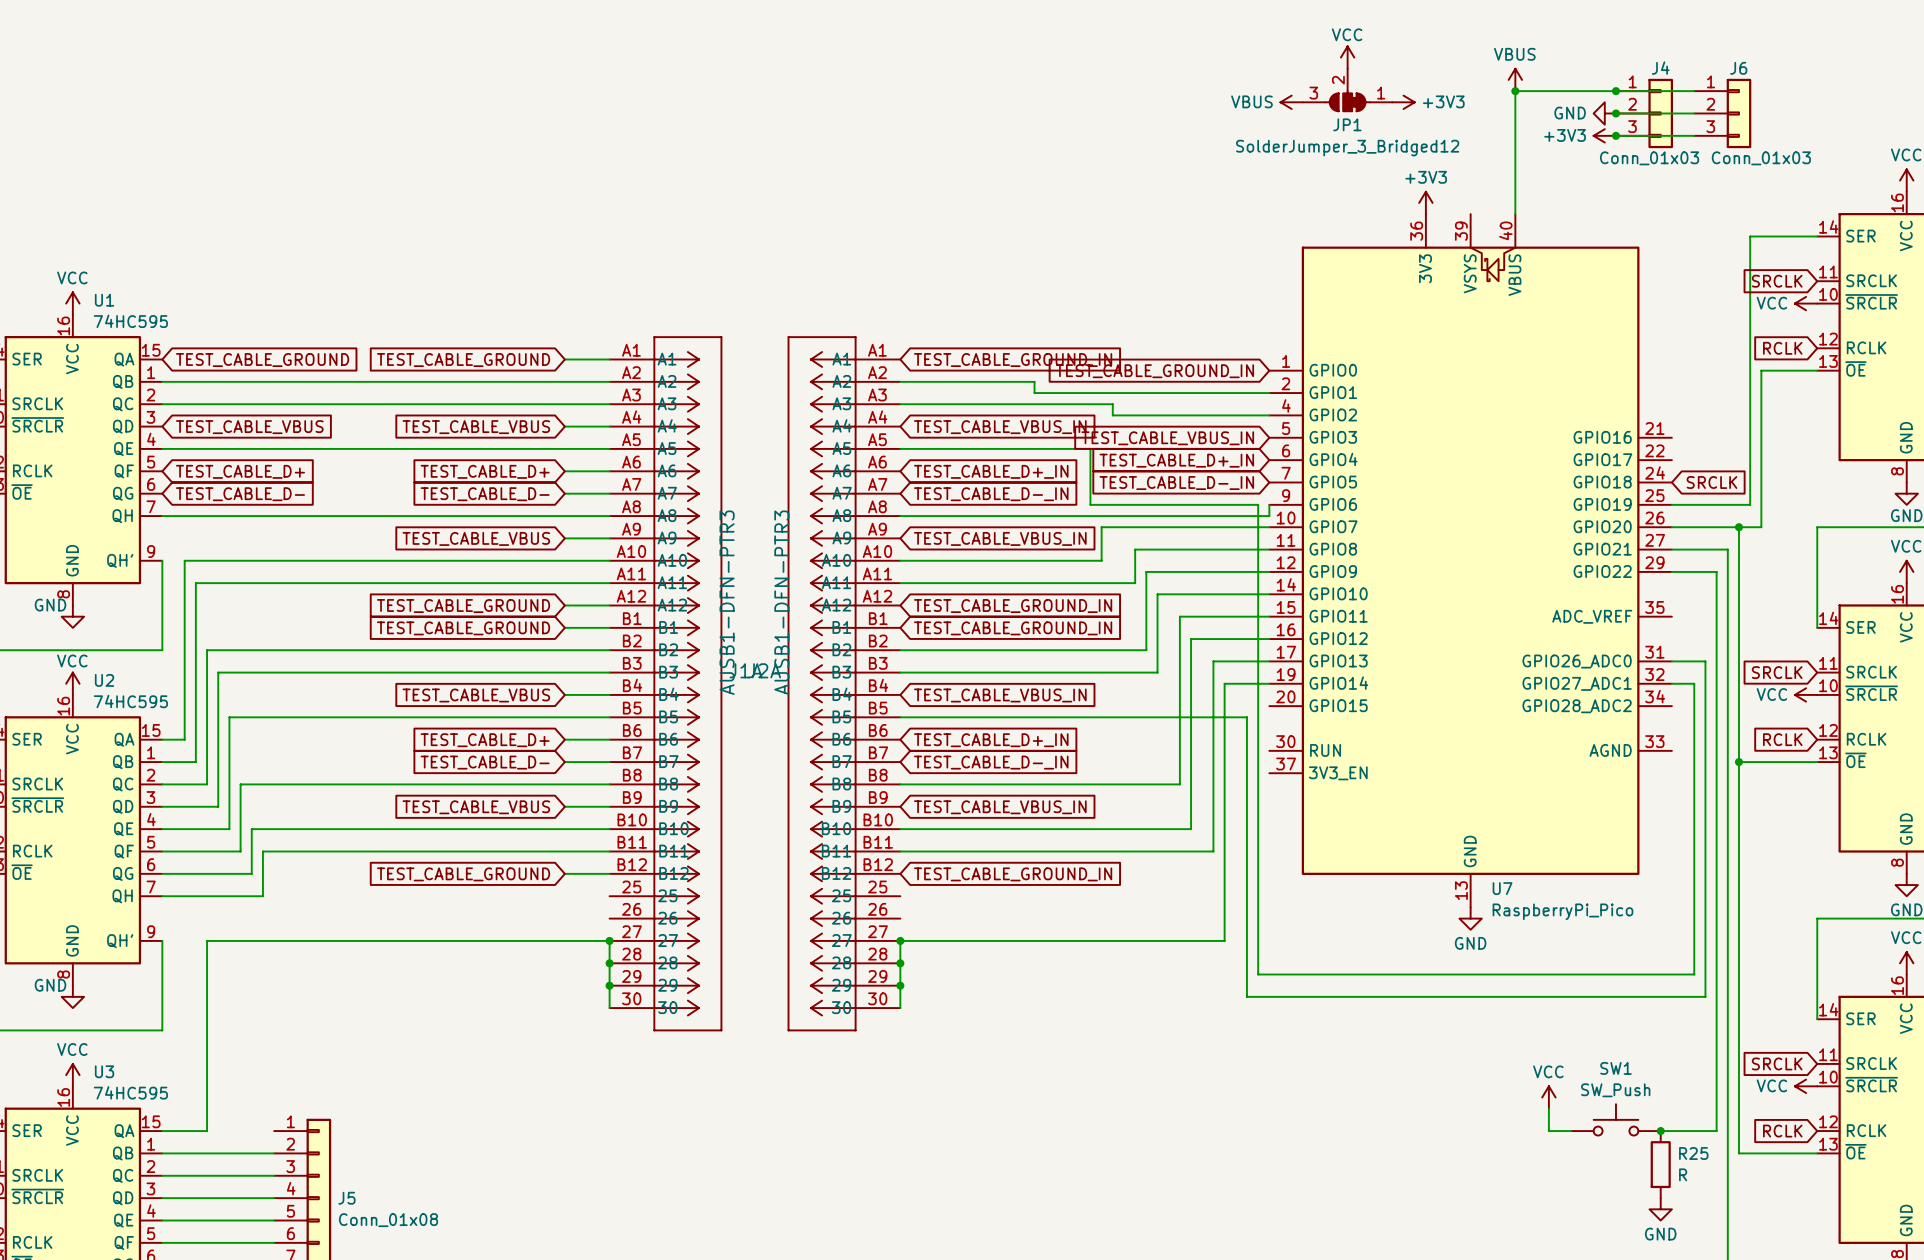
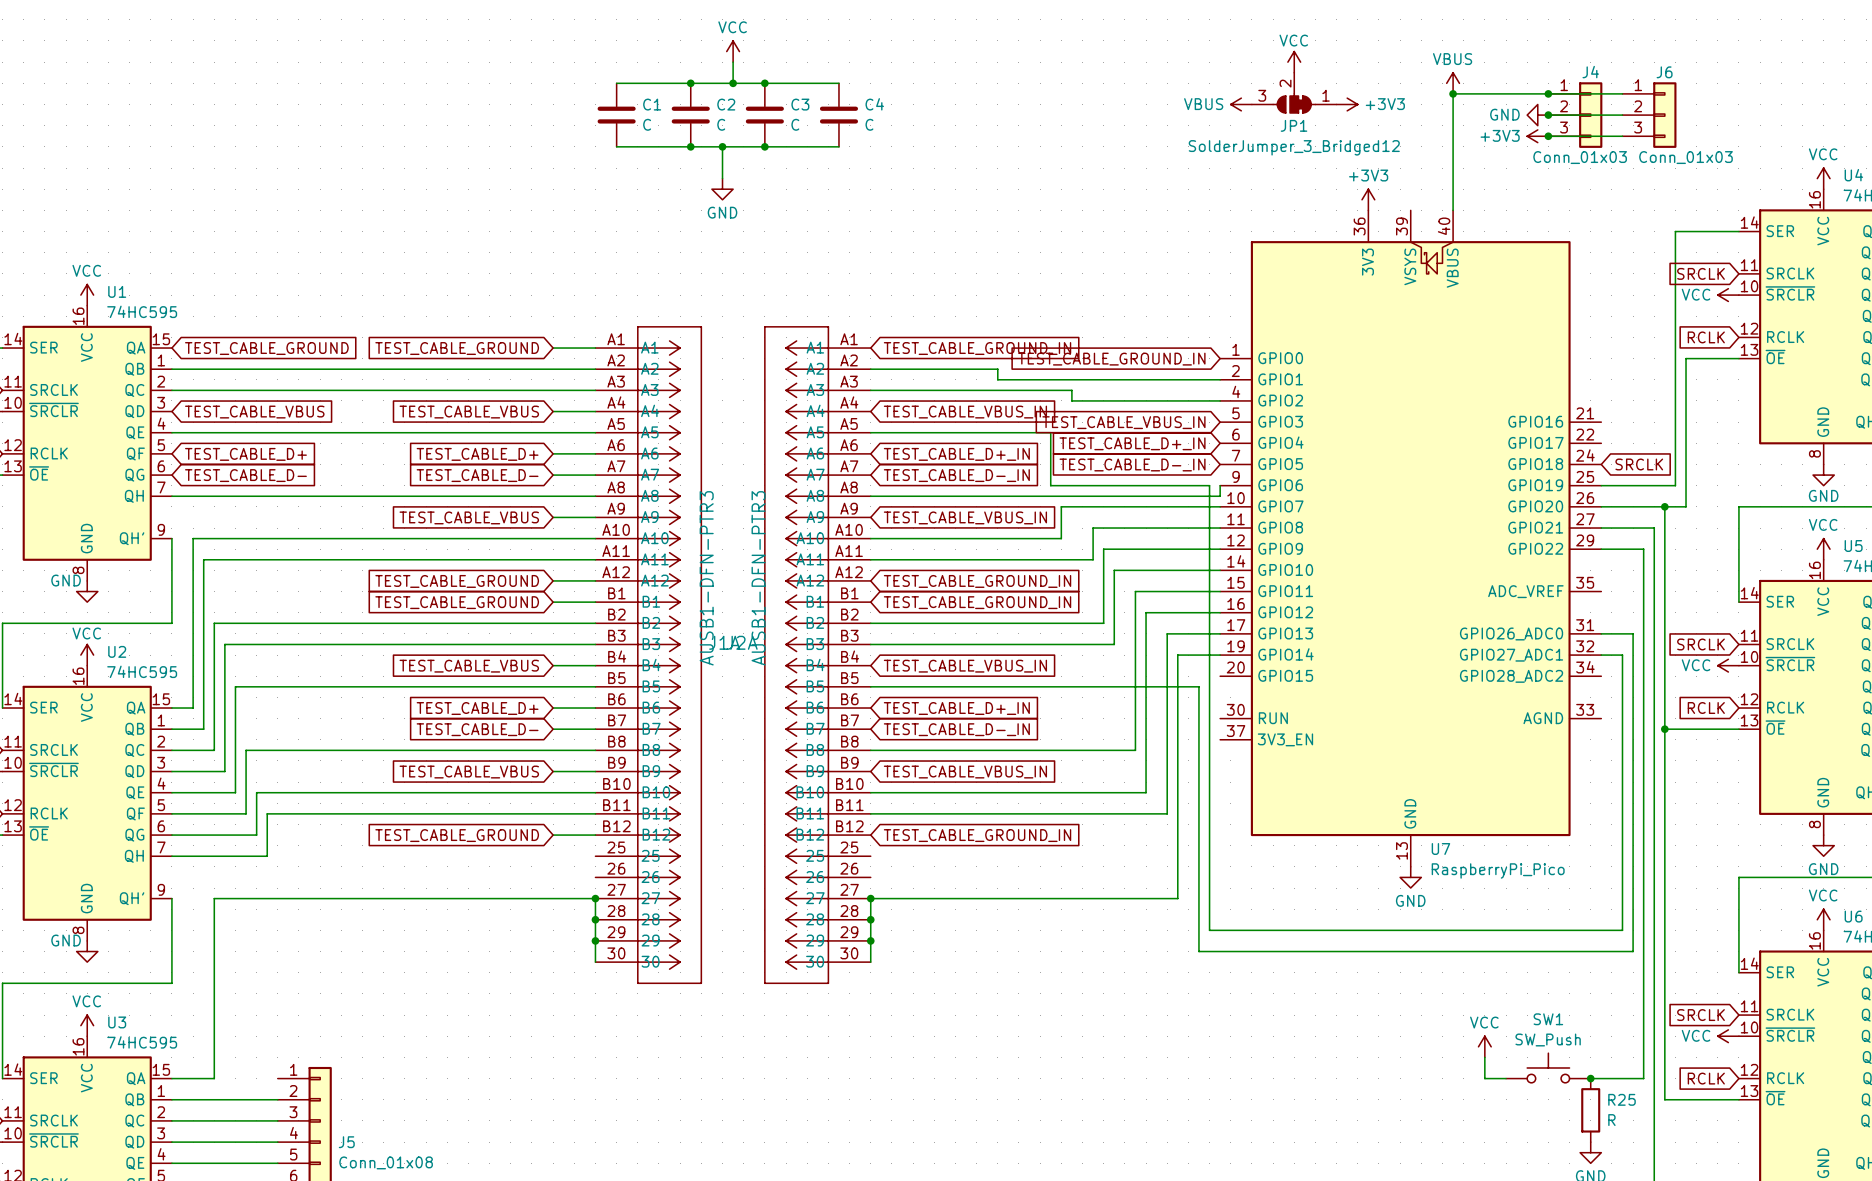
power symbol: none -> VCC (733, 51)
wire: none -> (733, 62) (733, 83)
wire: none -> (616, 83) (838, 83)
junction: none -> (690, 83)
junction: none -> (733, 83)
junction: none -> (764, 83)
C1: none -> C (616, 115)
C2: none -> C (690, 115)
C3: none -> C (764, 115)
C4: none -> C (838, 115)
wire: none -> (616, 146) (838, 146)
junction: none -> (690, 146)
wire: none -> (722, 146) (722, 178)
junction: none -> (722, 146)
junction: none -> (764, 146)
power symbol: none -> GND (722, 189)

